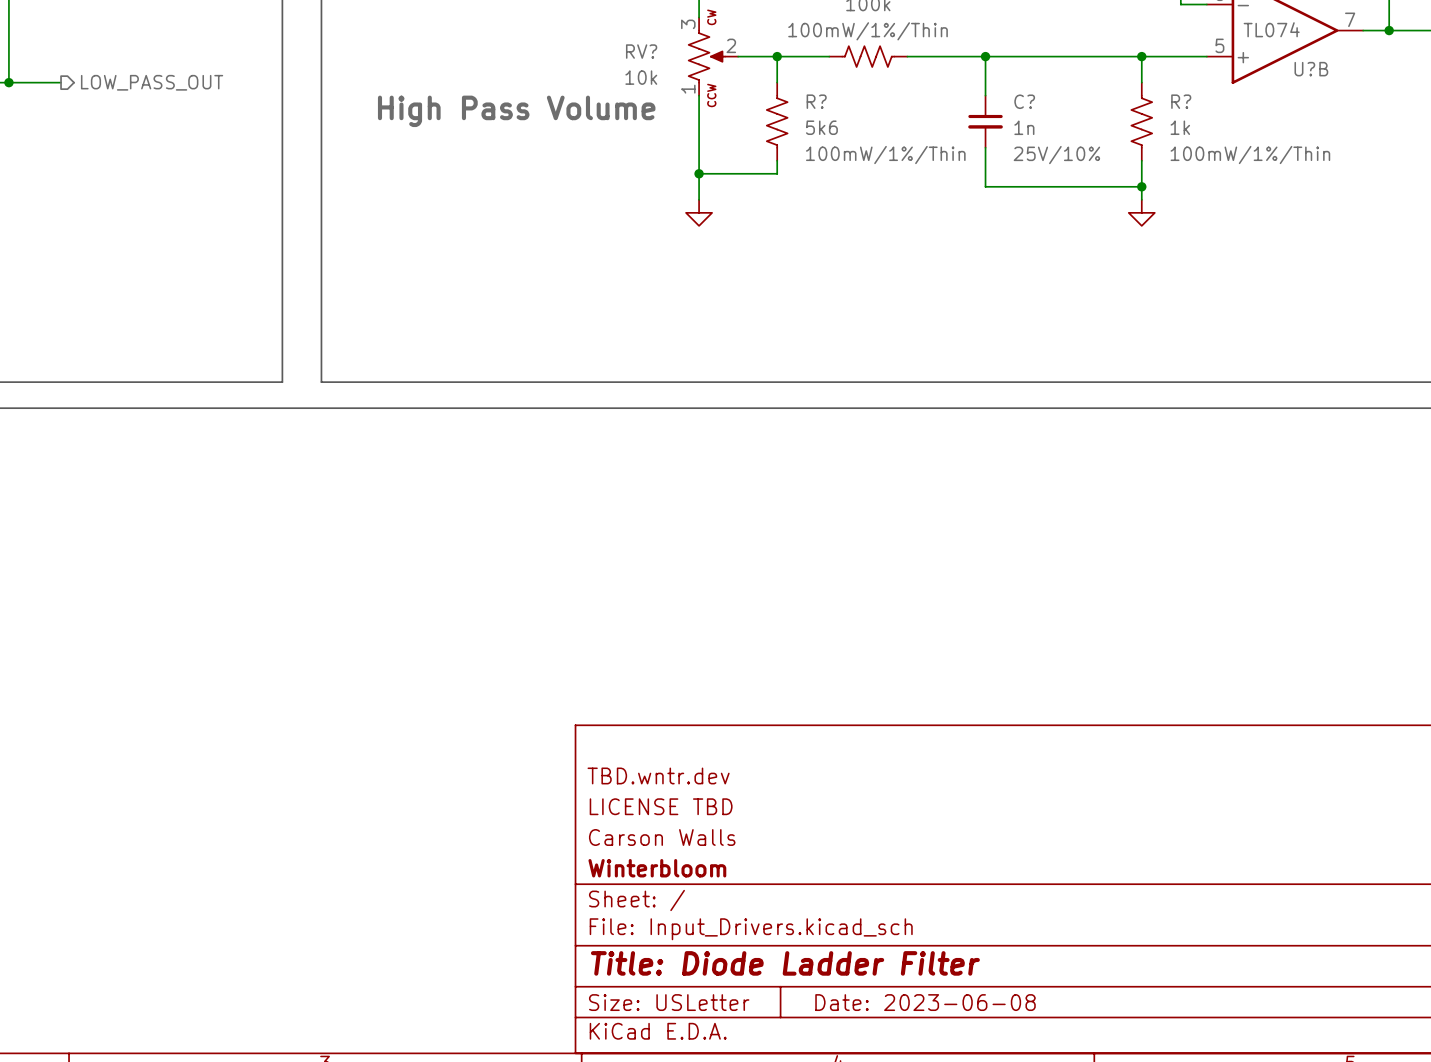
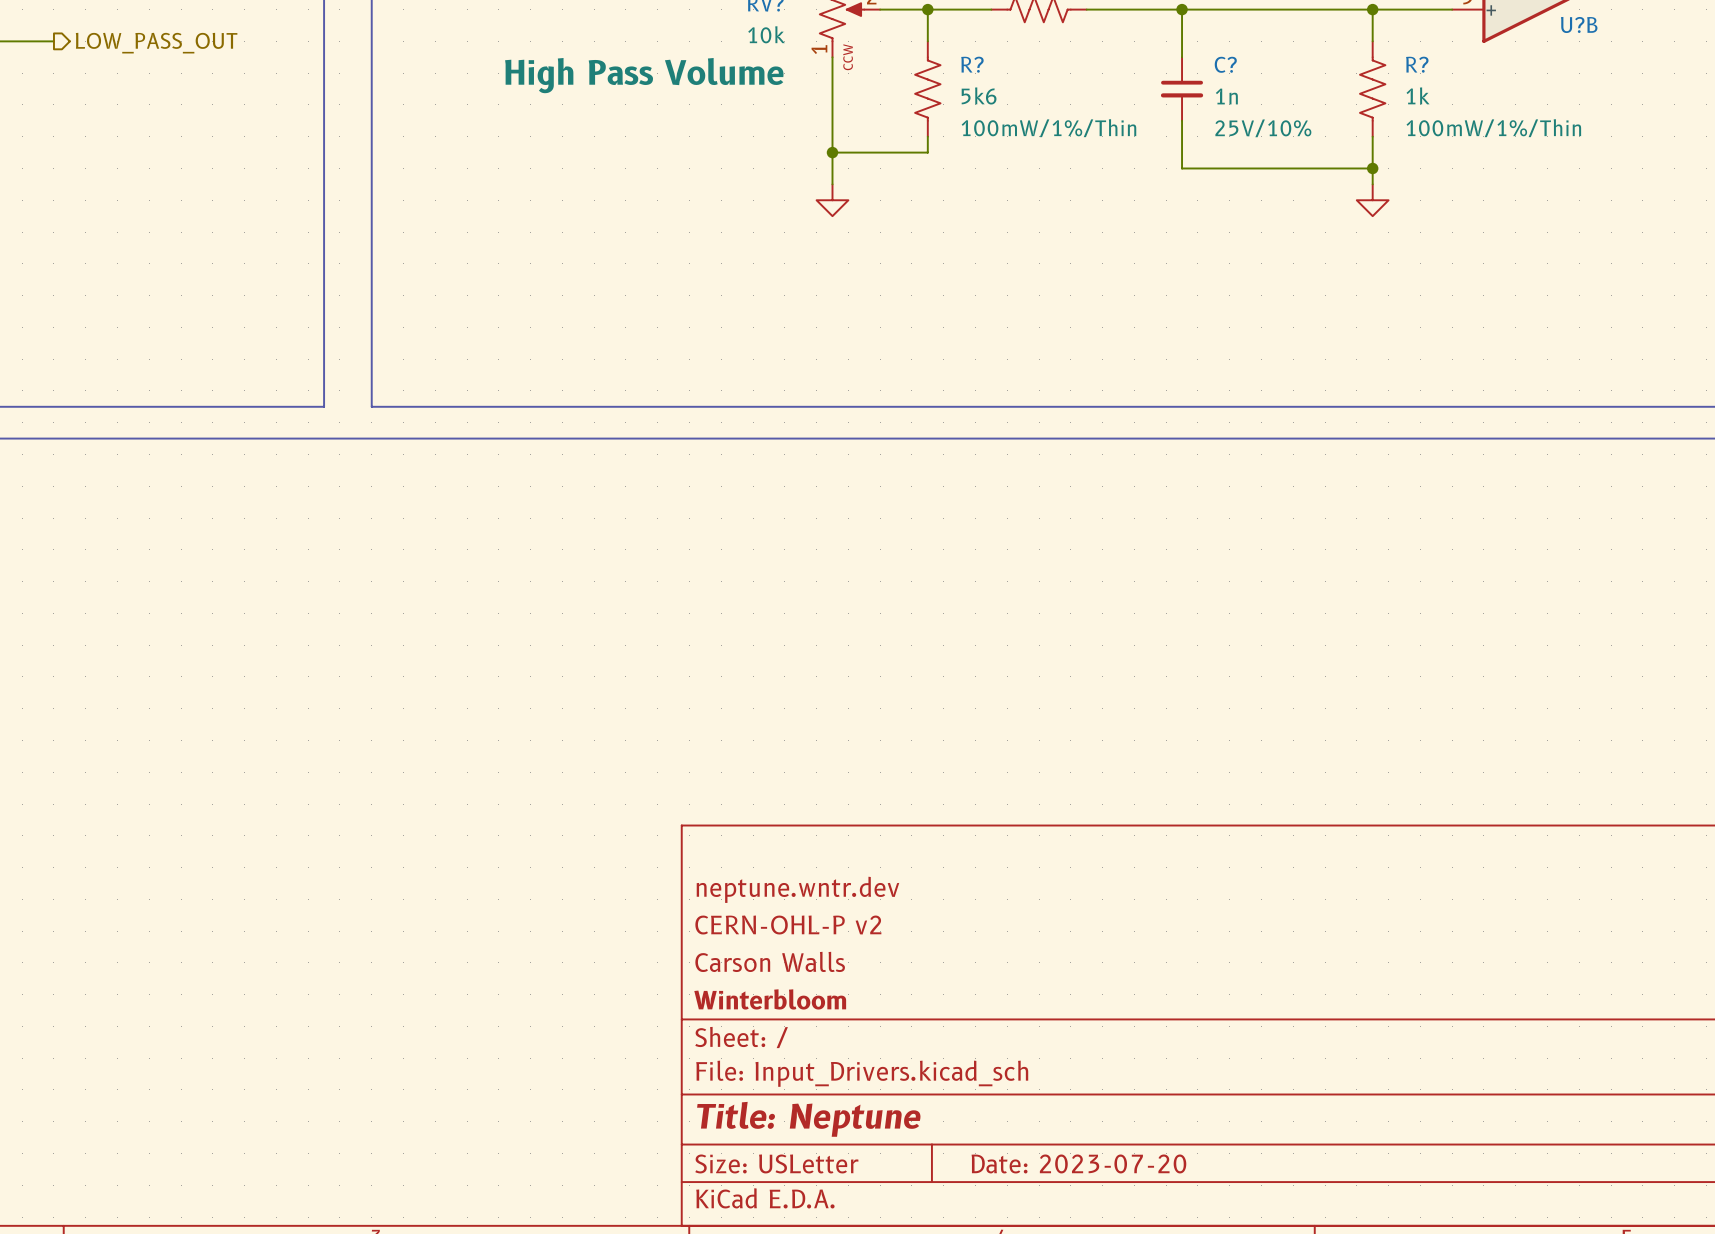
title block: TBD.wntr.dev (658, 775) -> neptune.wntr.dev (797, 889)
title block: LICENSE TBD (661, 806) -> CERN-OHL-P v2 (788, 925)
title block: Title: Diode Ladder Filter (785, 963) -> Title: Neptune (808, 1119)
title block: Date: 2023-06-08 (925, 1002) -> Date: 2023-07-20 (1078, 1163)

